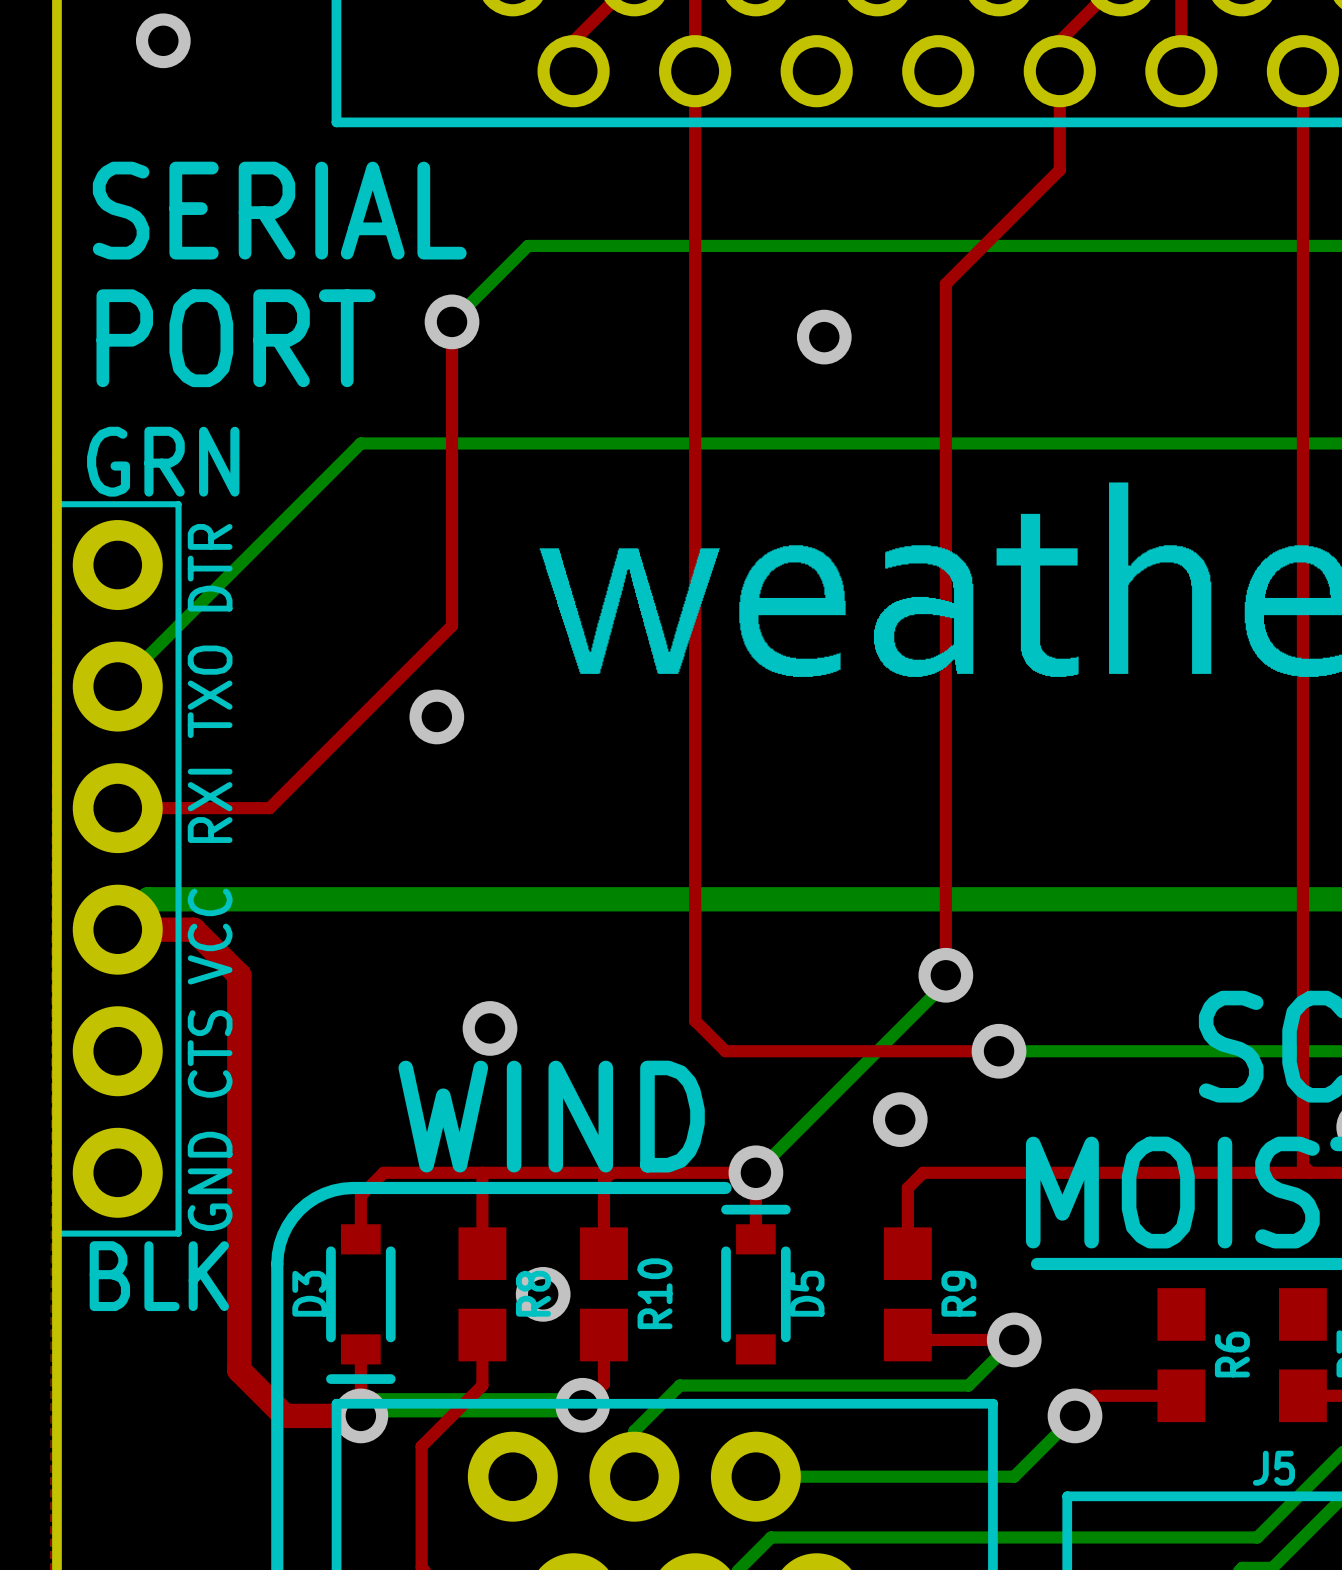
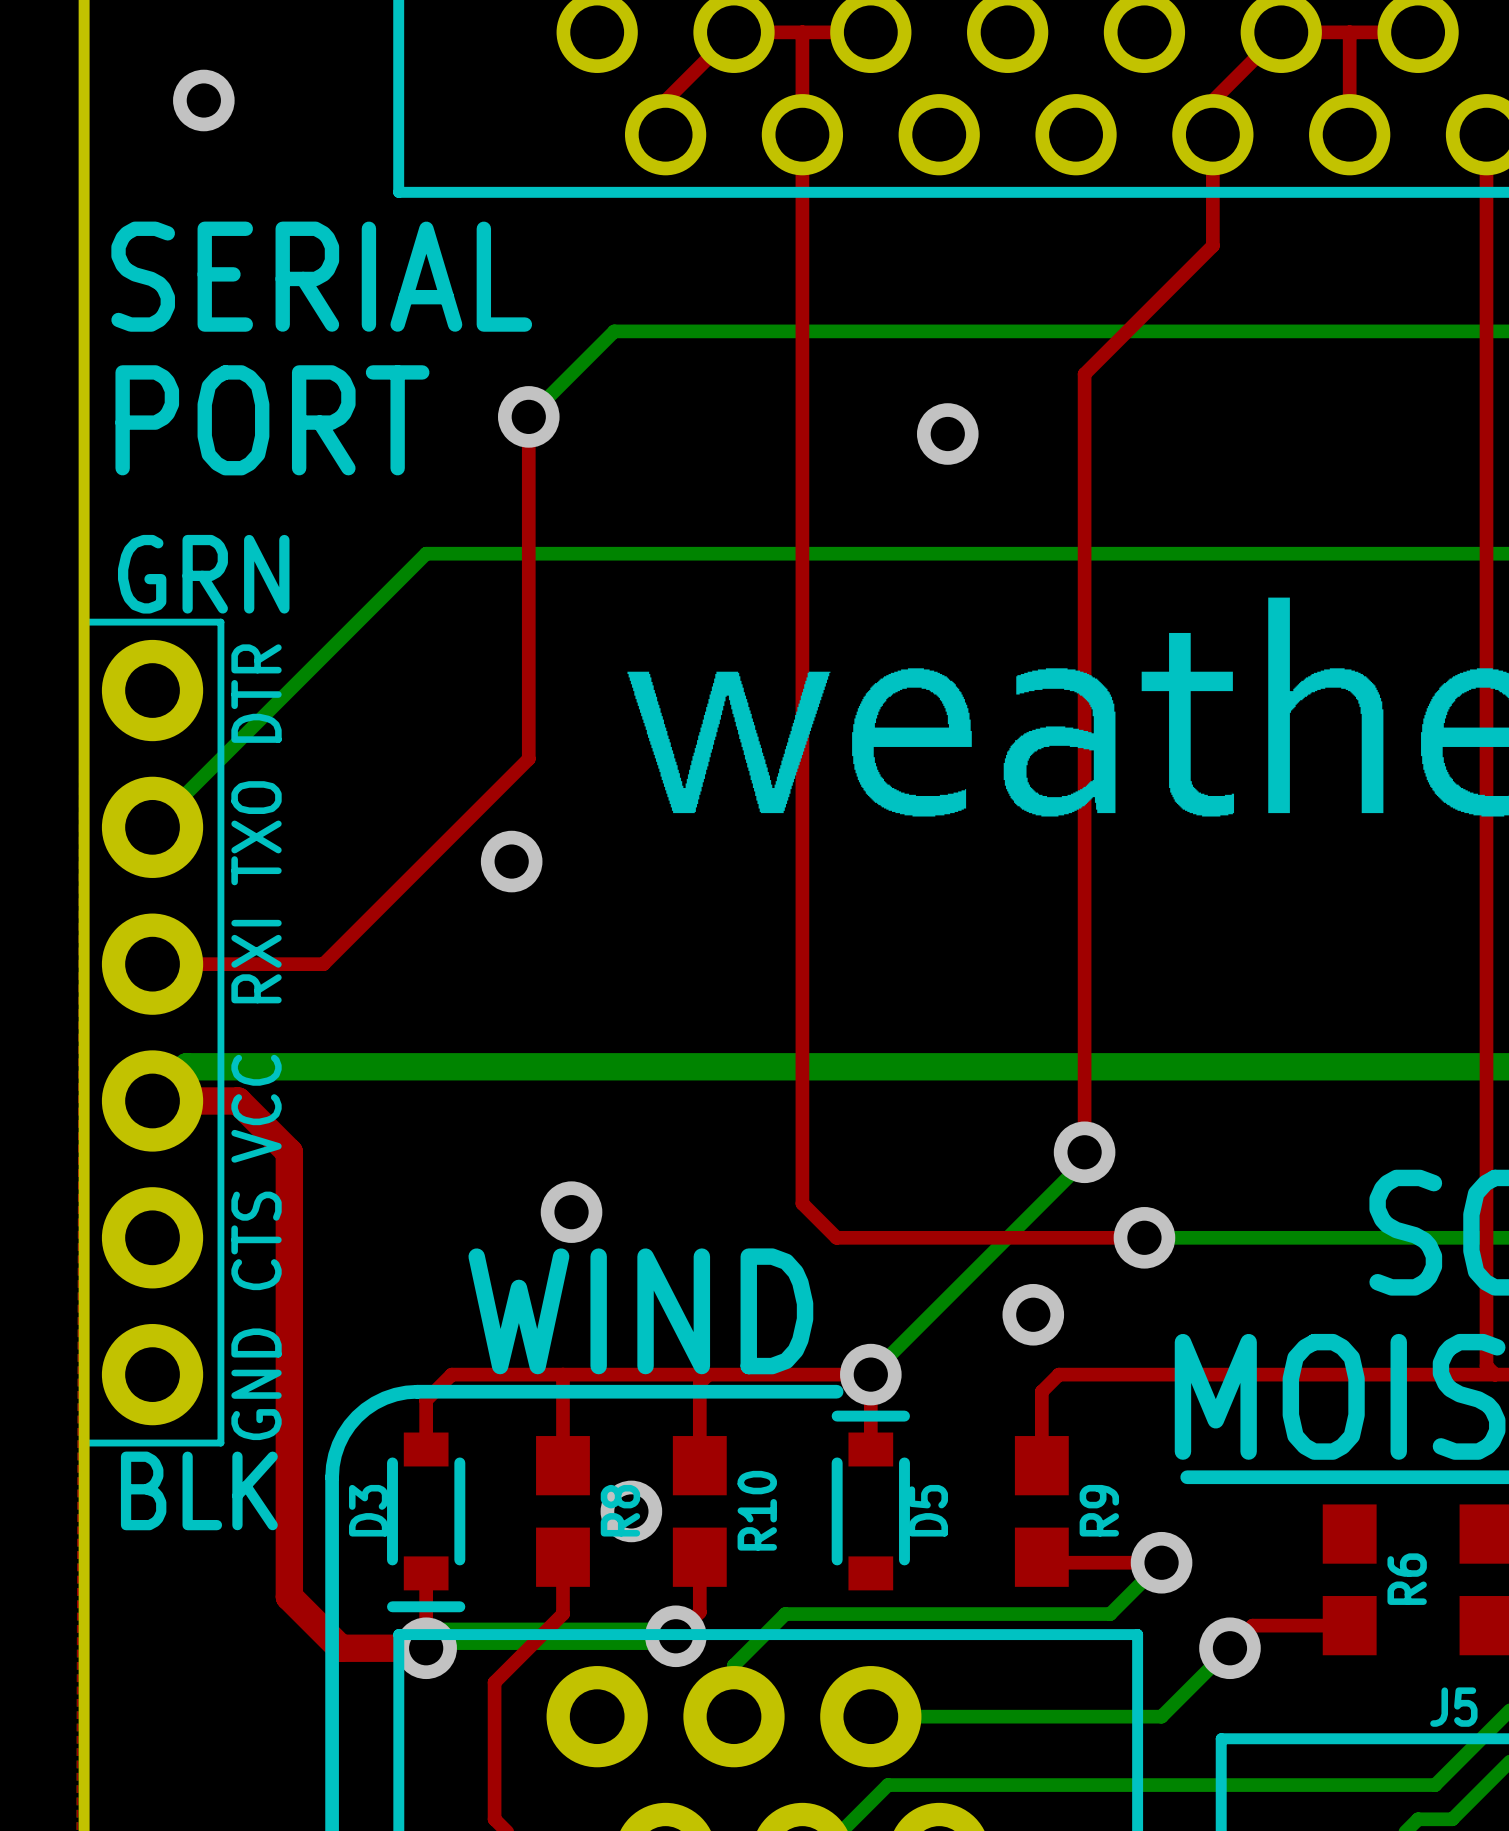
text position: SERIAL (279, 210) -> SERIAL (321, 276)
text position: PORT (235, 338) -> PORT (272, 420)

